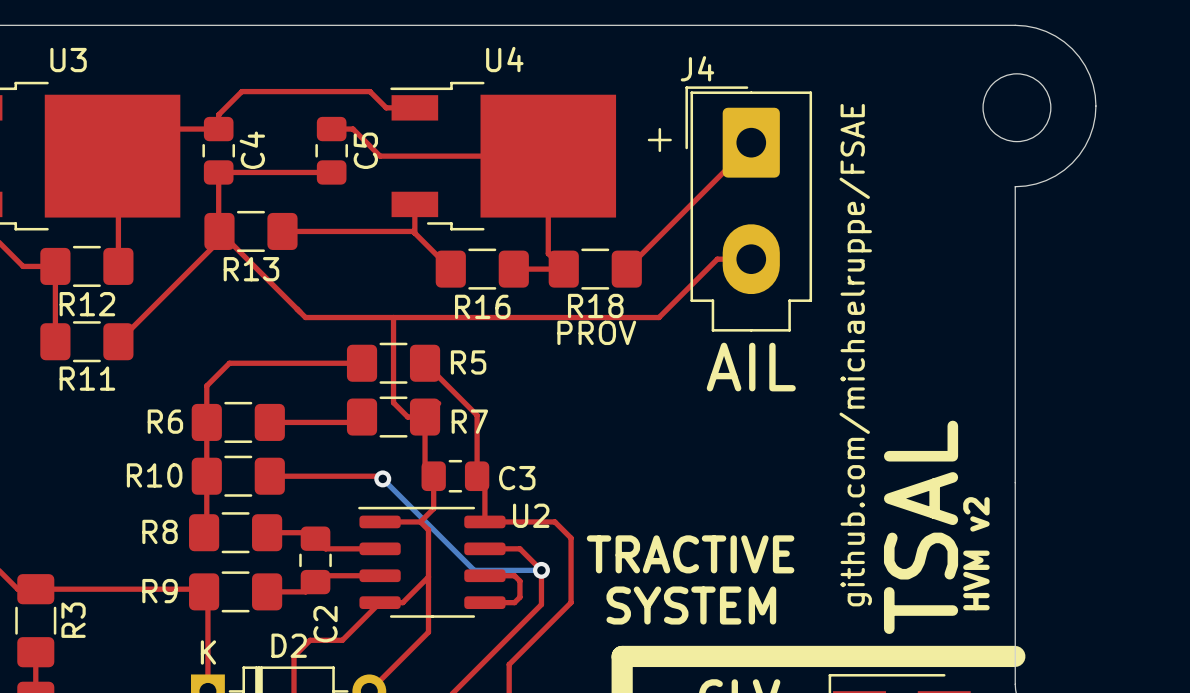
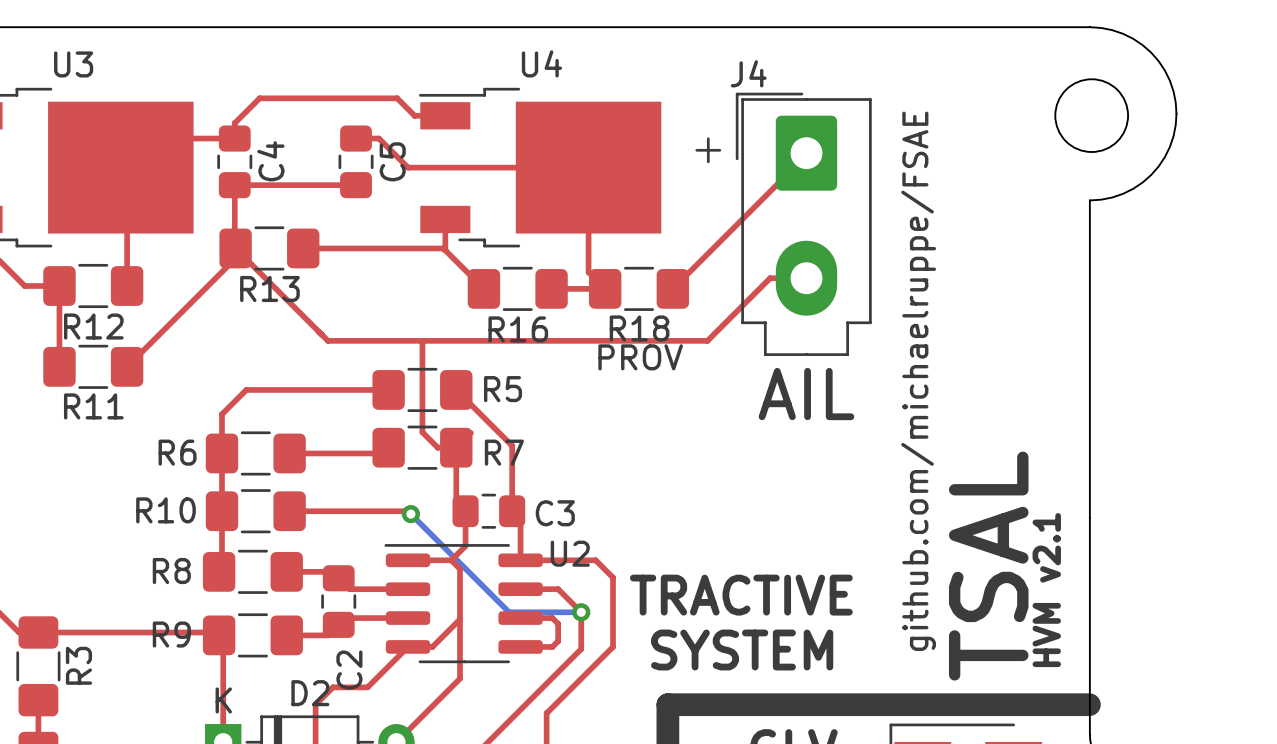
text: HVM v2 (976, 553) -> HVM v2.1 (1046, 590)

